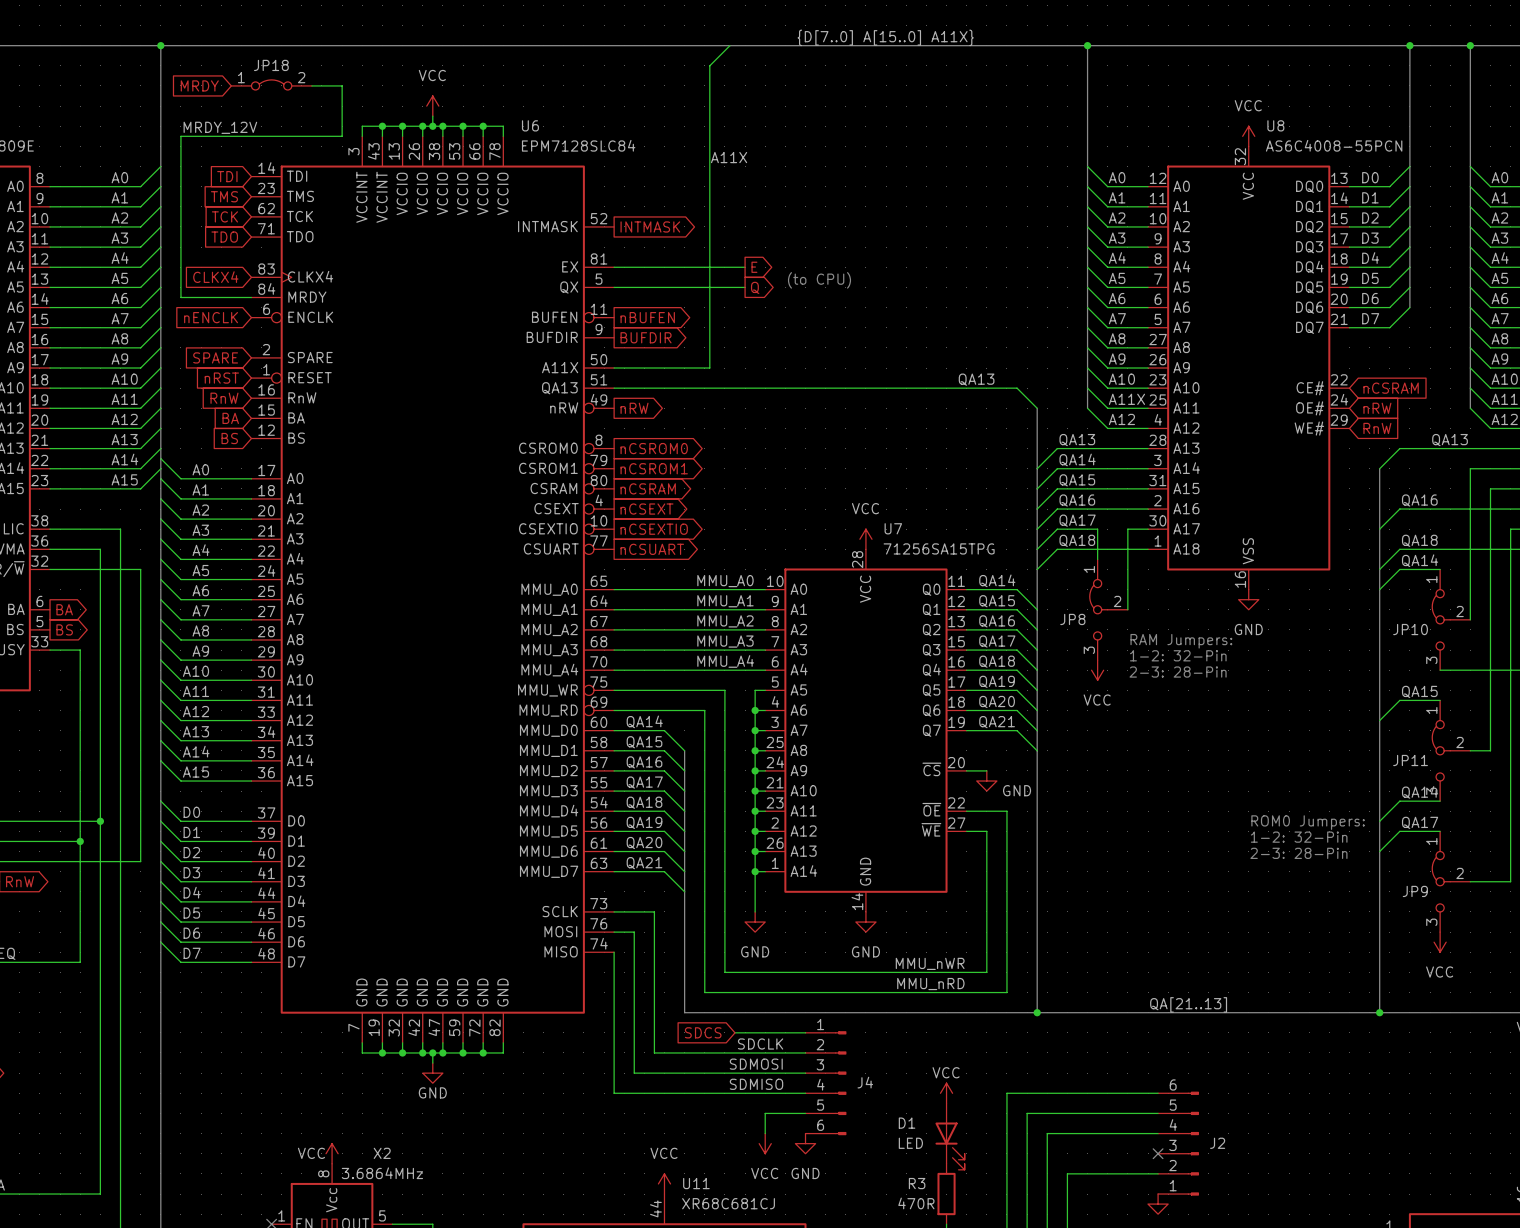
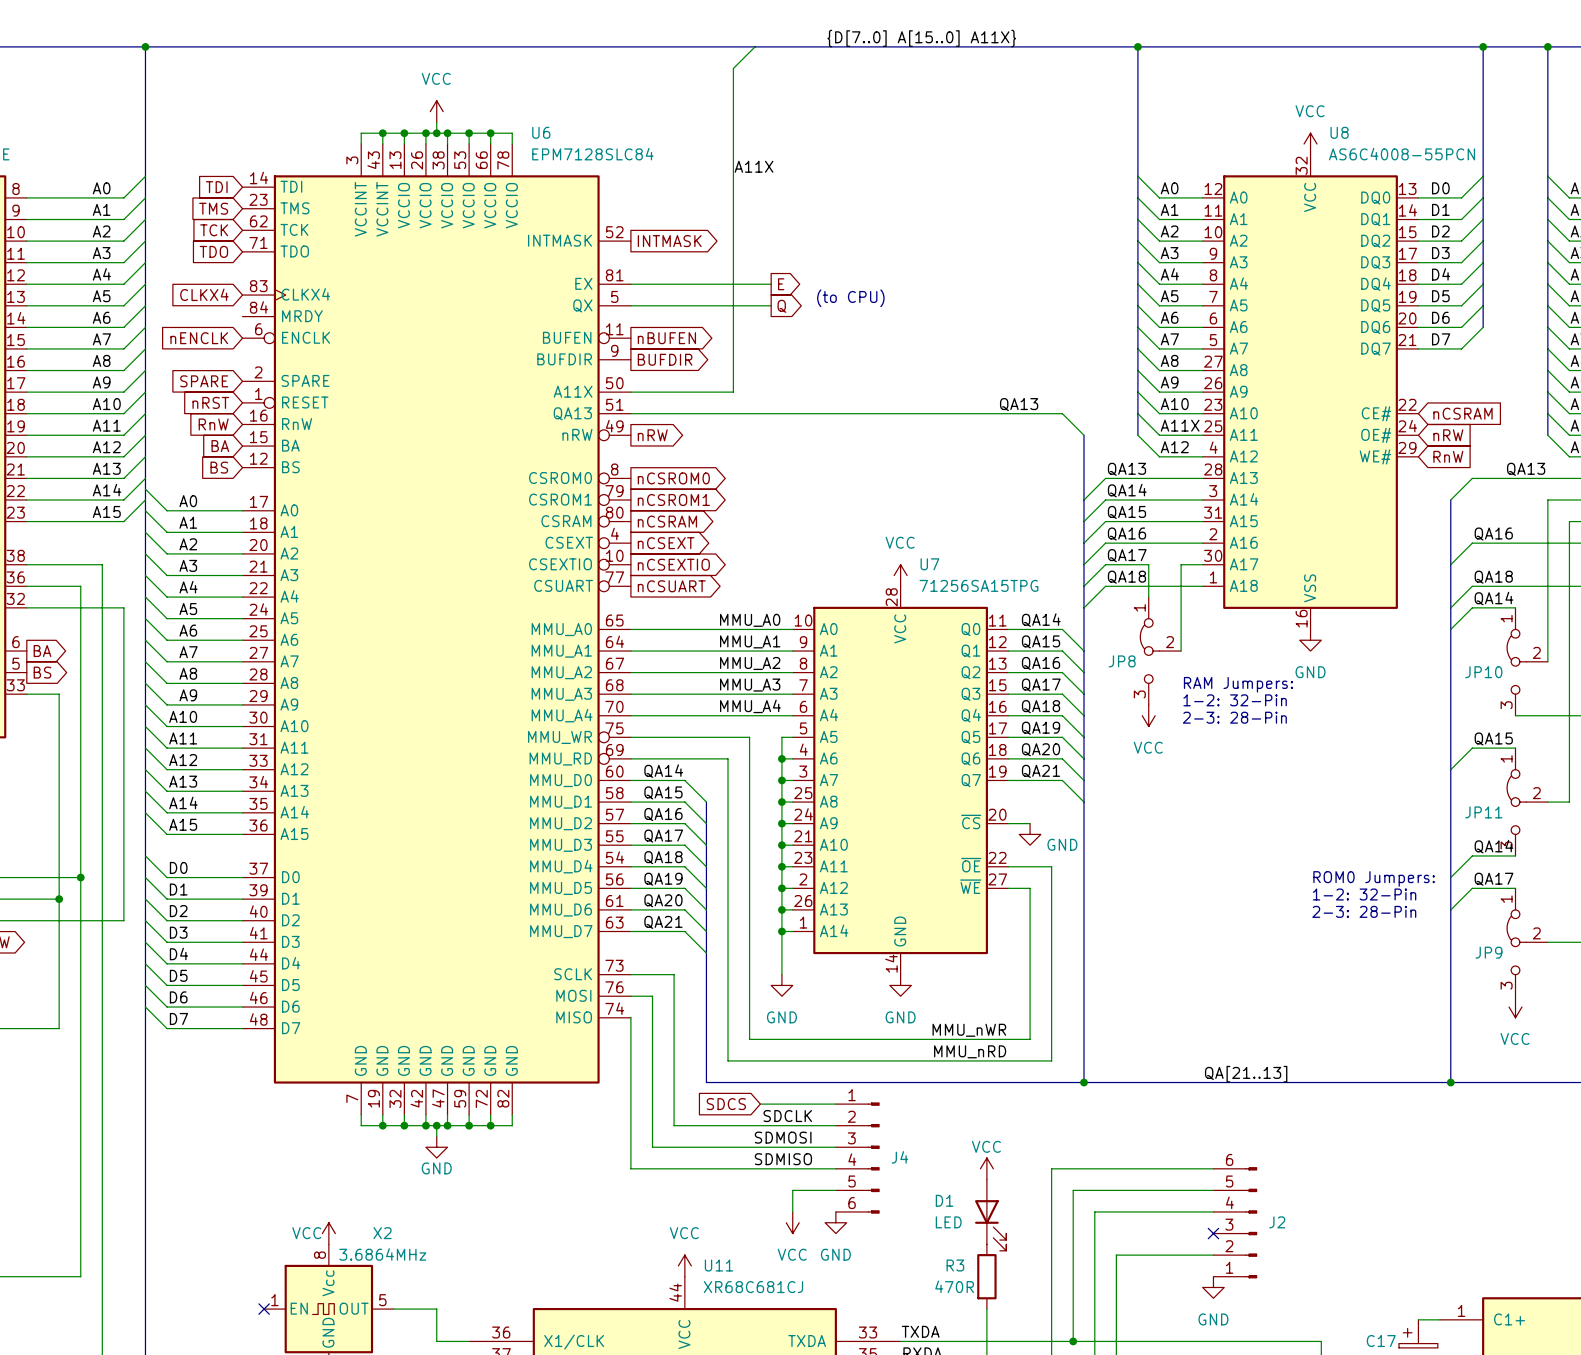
JP18: (271, 84) -> none
global label: MRDY (199, 85) -> none
wire: (311, 85) (342, 85) (342, 136) (180, 136) (180, 297) (251, 297) -> none
label: MRDY_12V (220, 127) -> none

